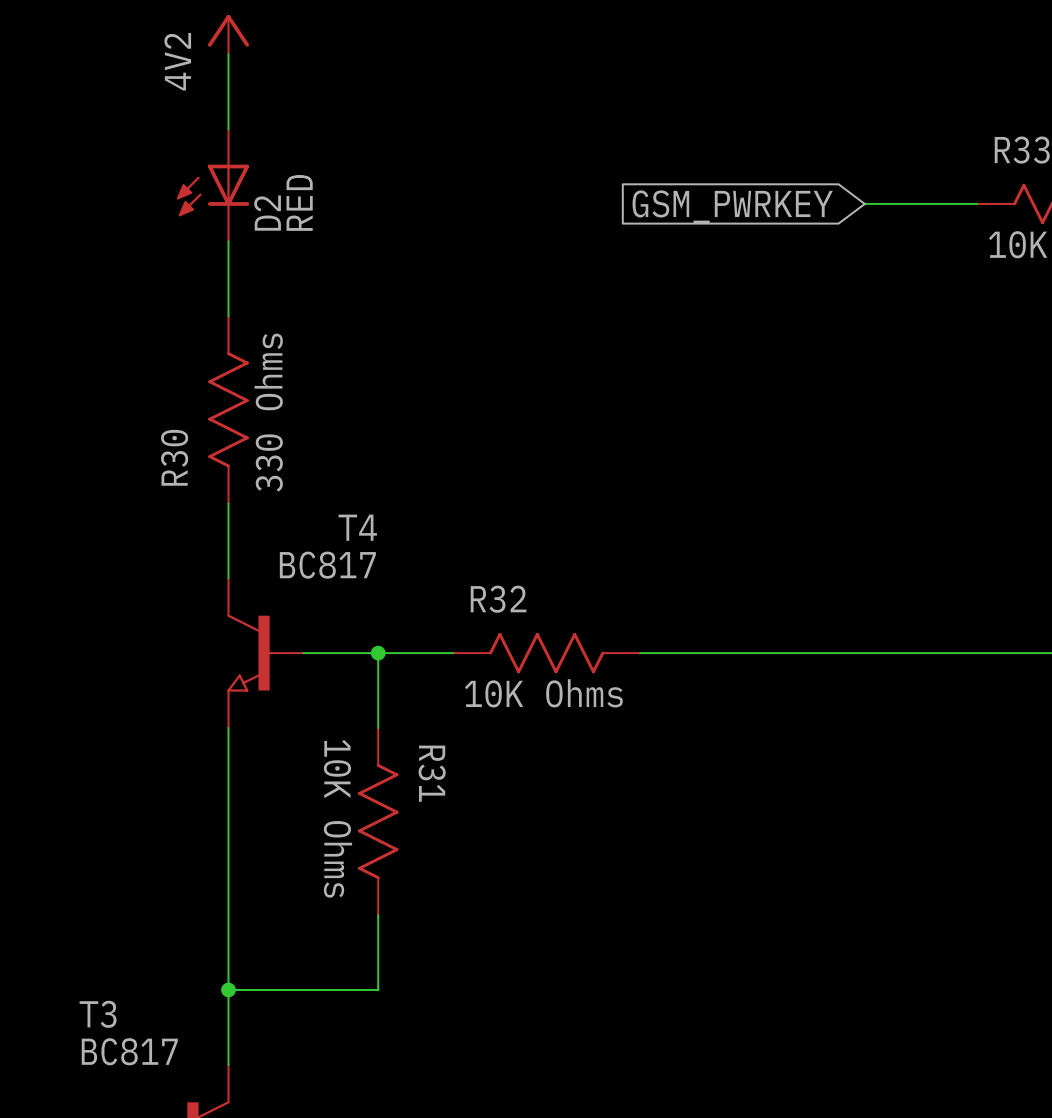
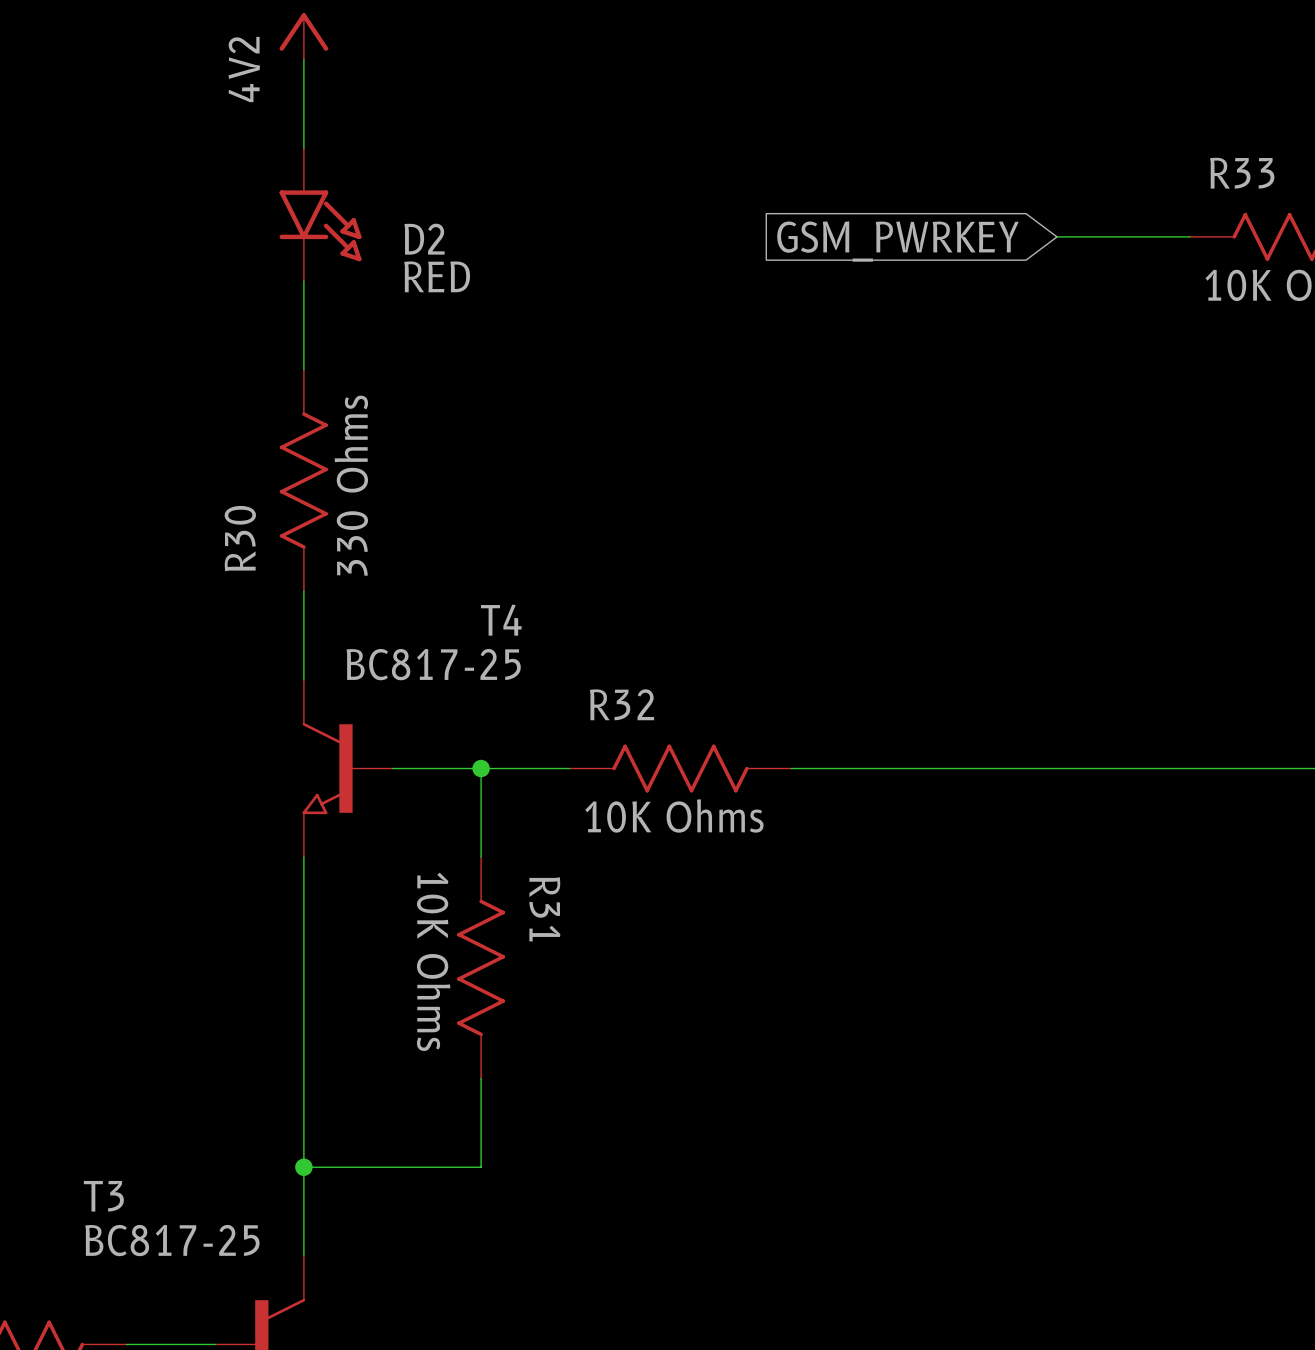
D2 symbol: [176, 129, 250, 242] -> [279, 148, 362, 282]
D2 value position: RED (299, 202) -> RED (437, 276)
D2 name position: D2 (267, 213) -> D2 (424, 239)
T4 name position: T4 (357, 527) -> T4 (501, 620)
T4 value: BC817 (327, 565) -> BC817-25 (433, 664)
T3 name position: T3 (98, 1014) -> T3 (103, 1196)
T3 value: BC817 (129, 1051) -> BC817-25 (172, 1240)

